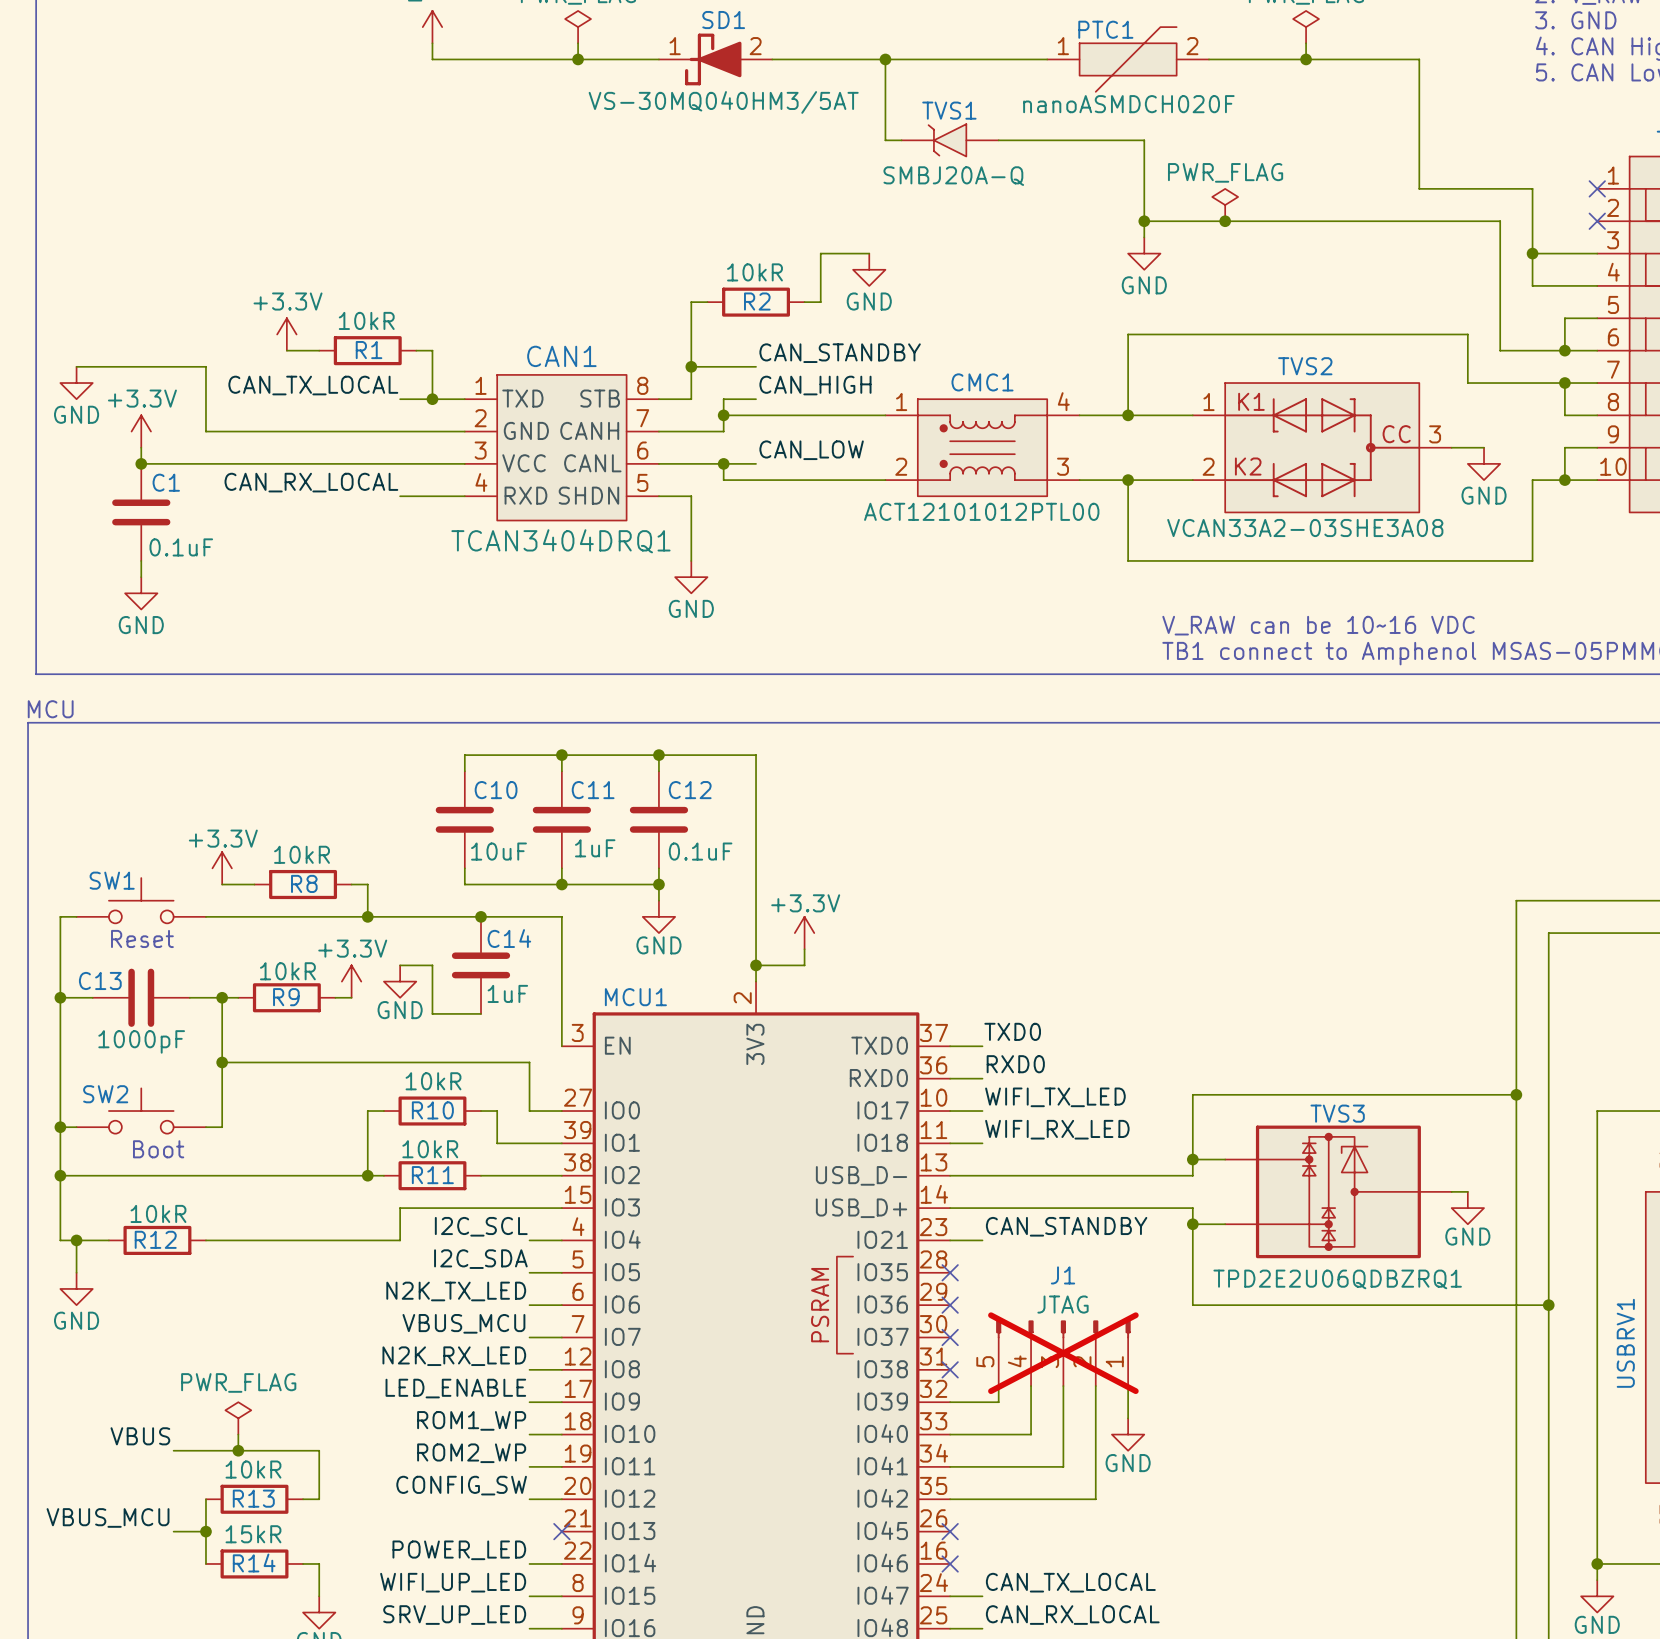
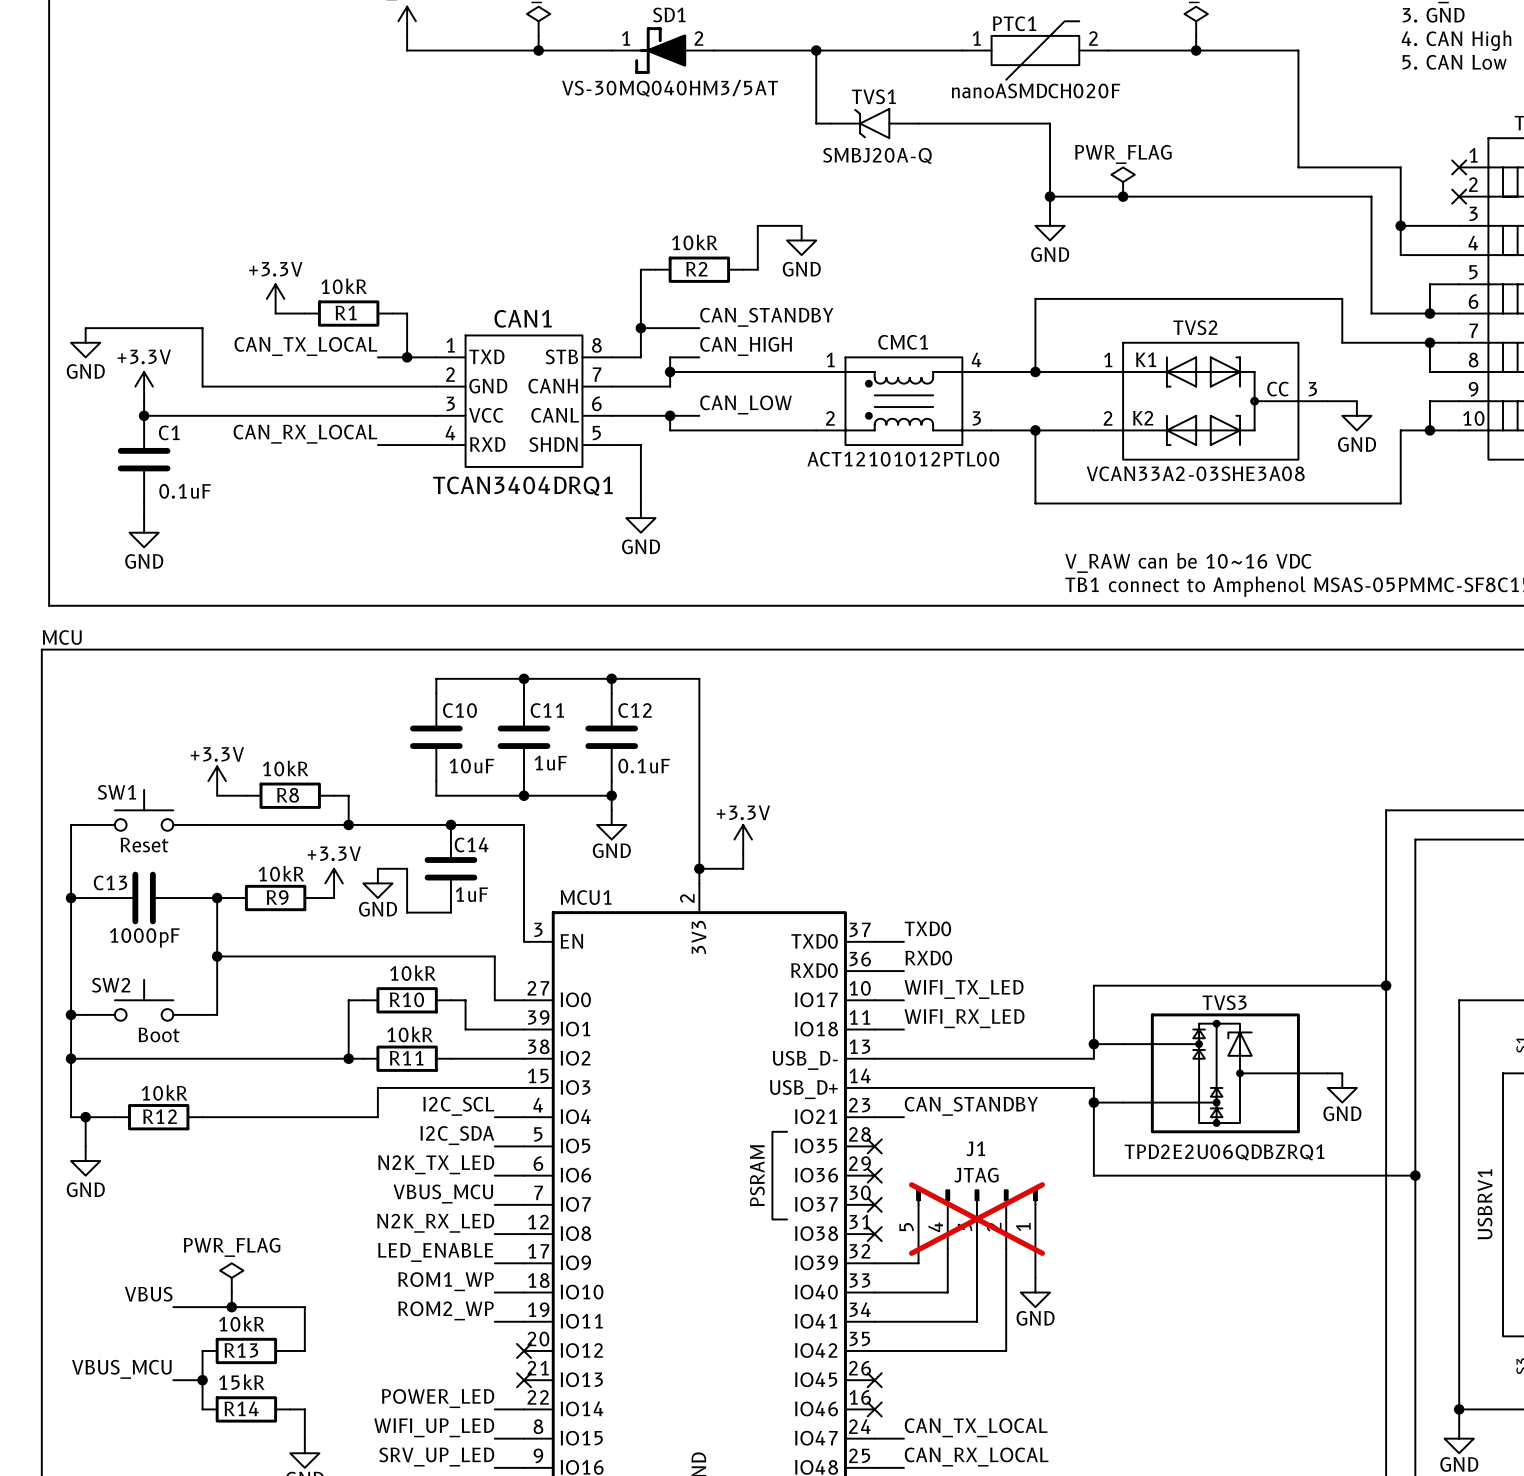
label: CONFIG_SW (461, 1485) -> none
wire: (529, 1499) (561, 1499) -> none
no-connect mark: none -> (524, 1350)

